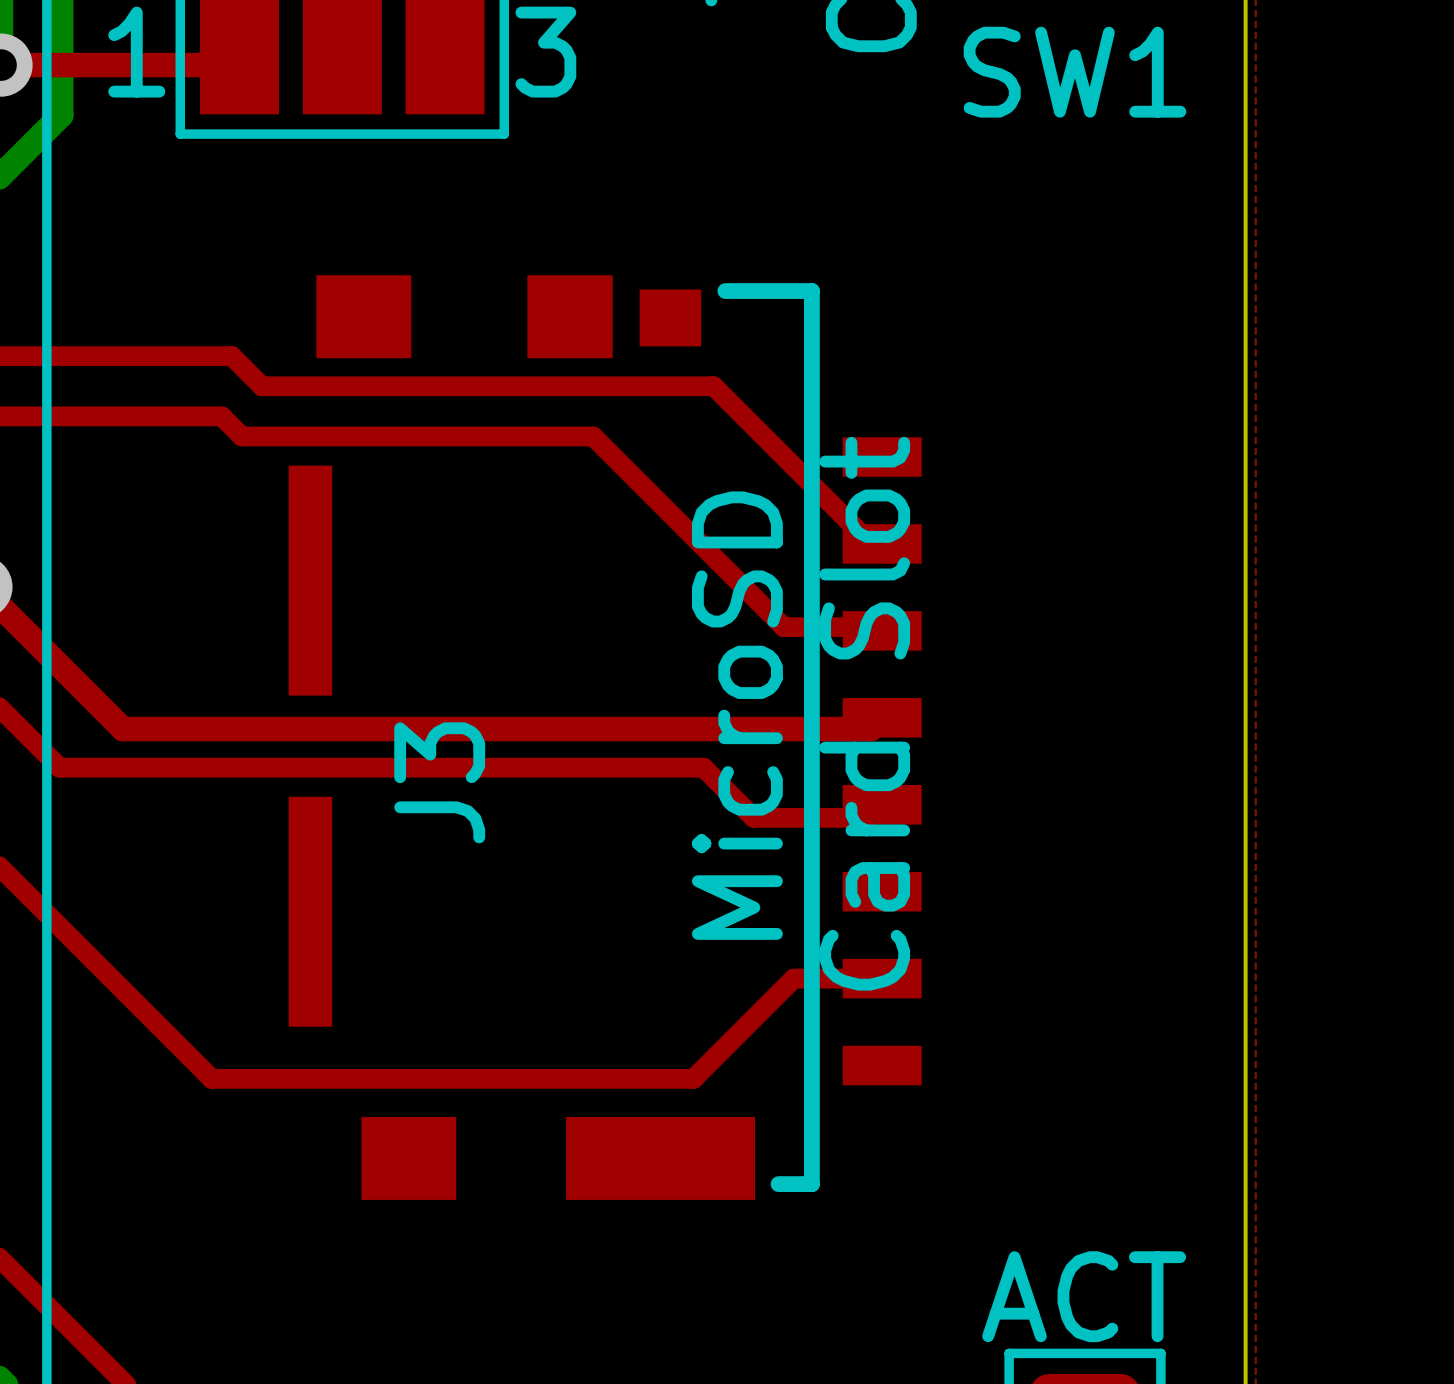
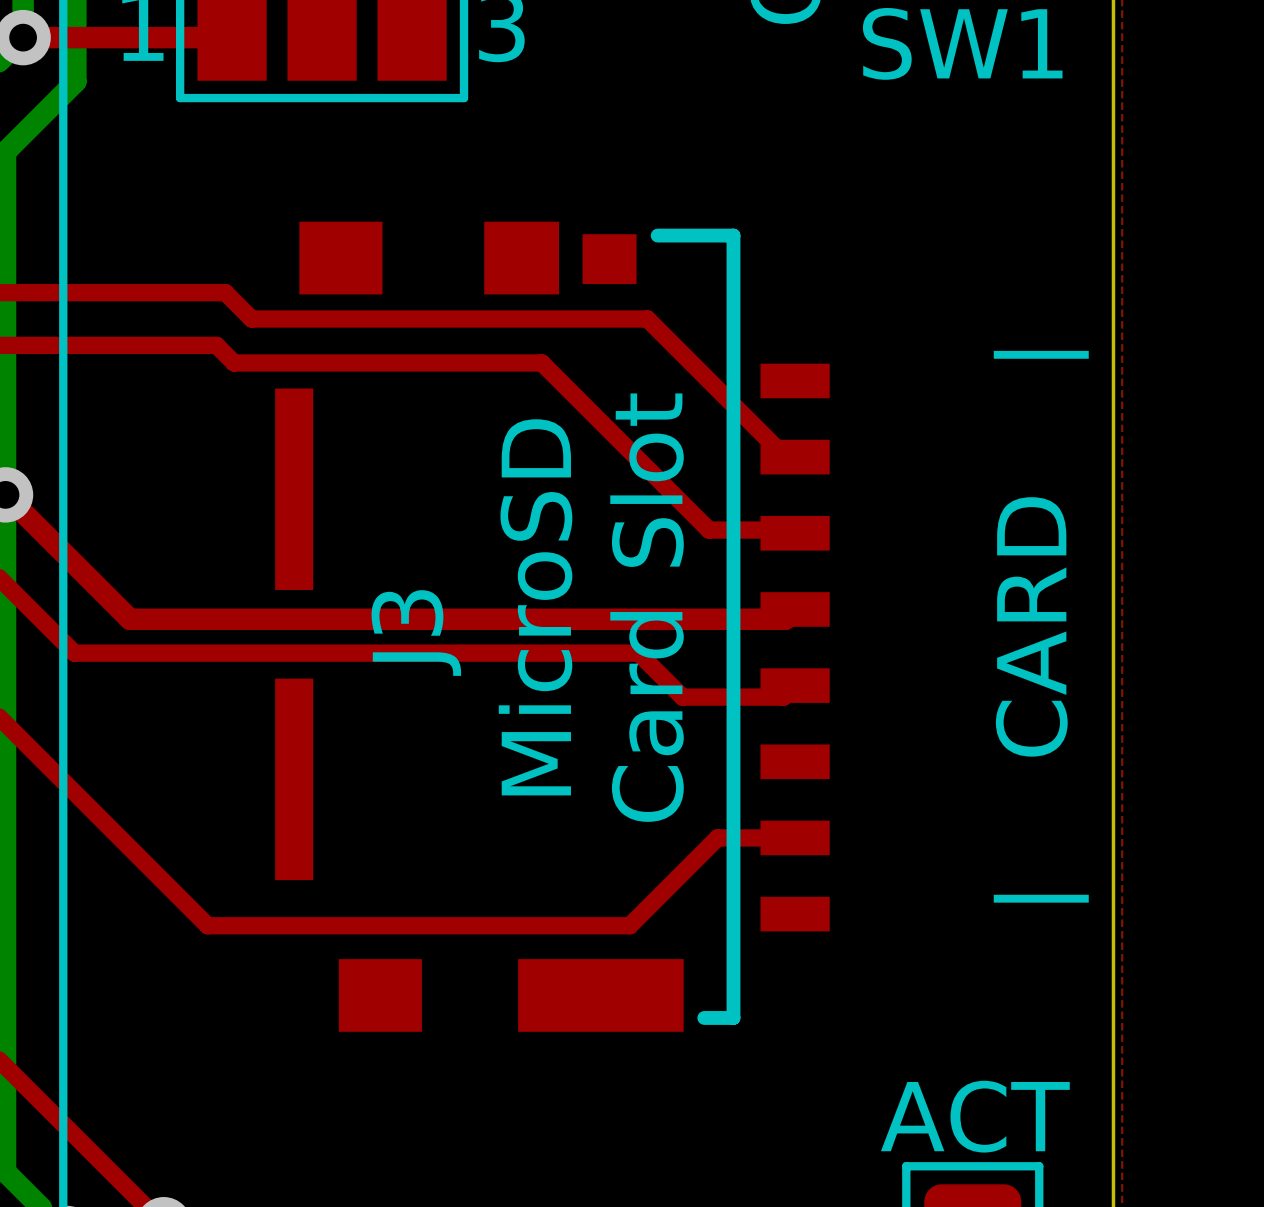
text position: Card Slot (864, 713) -> Card Slot (647, 607)
text position: MicroSD (737, 715) -> MicroSD (535, 607)
text: none -> | CARD | (1041, 626)
J3 name position: J3 (439, 782) -> J3 (416, 633)

